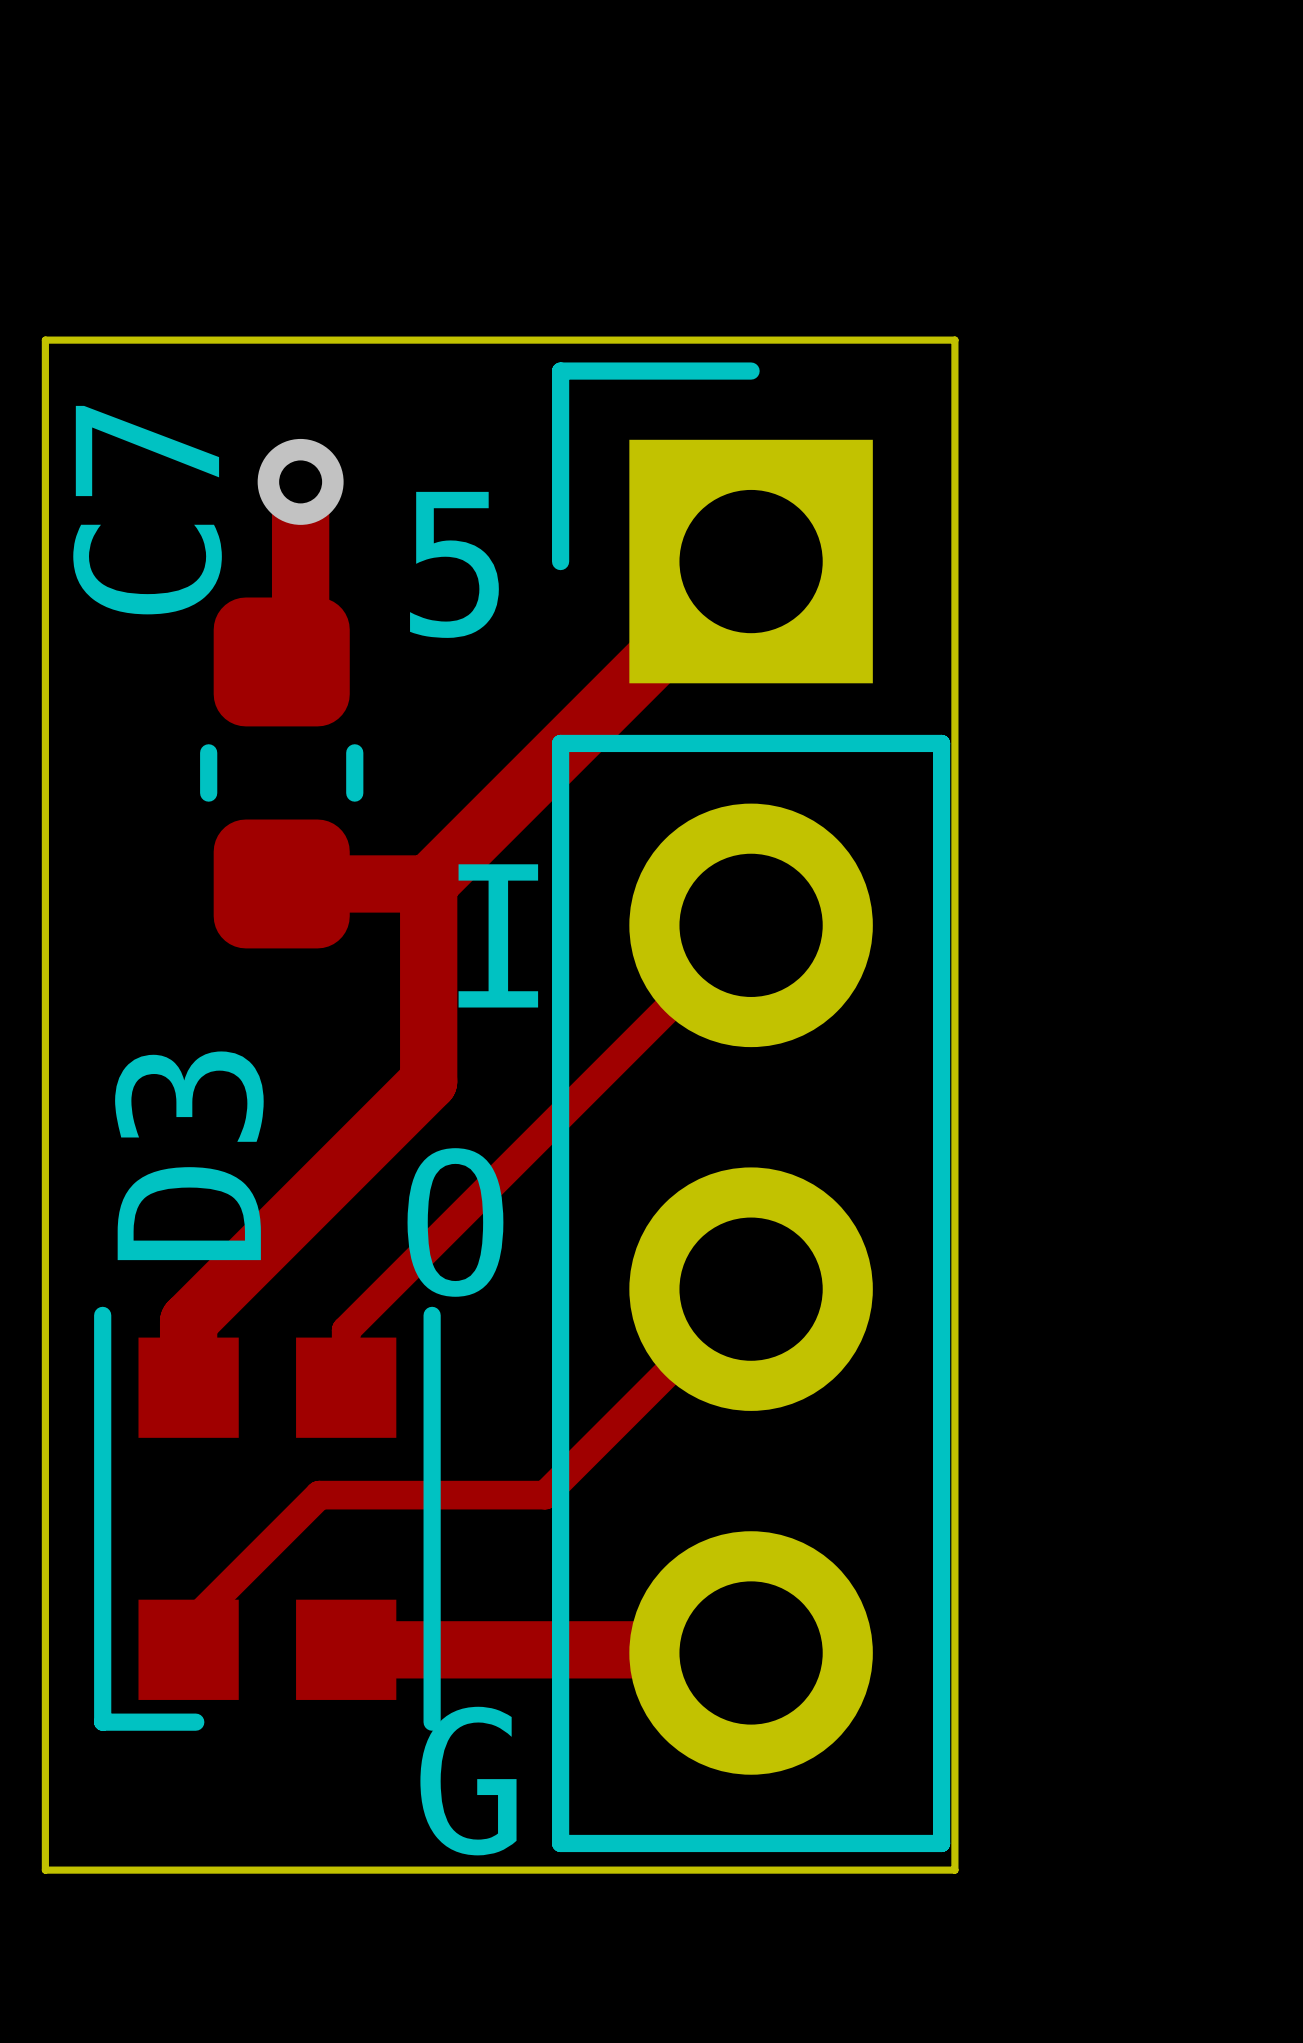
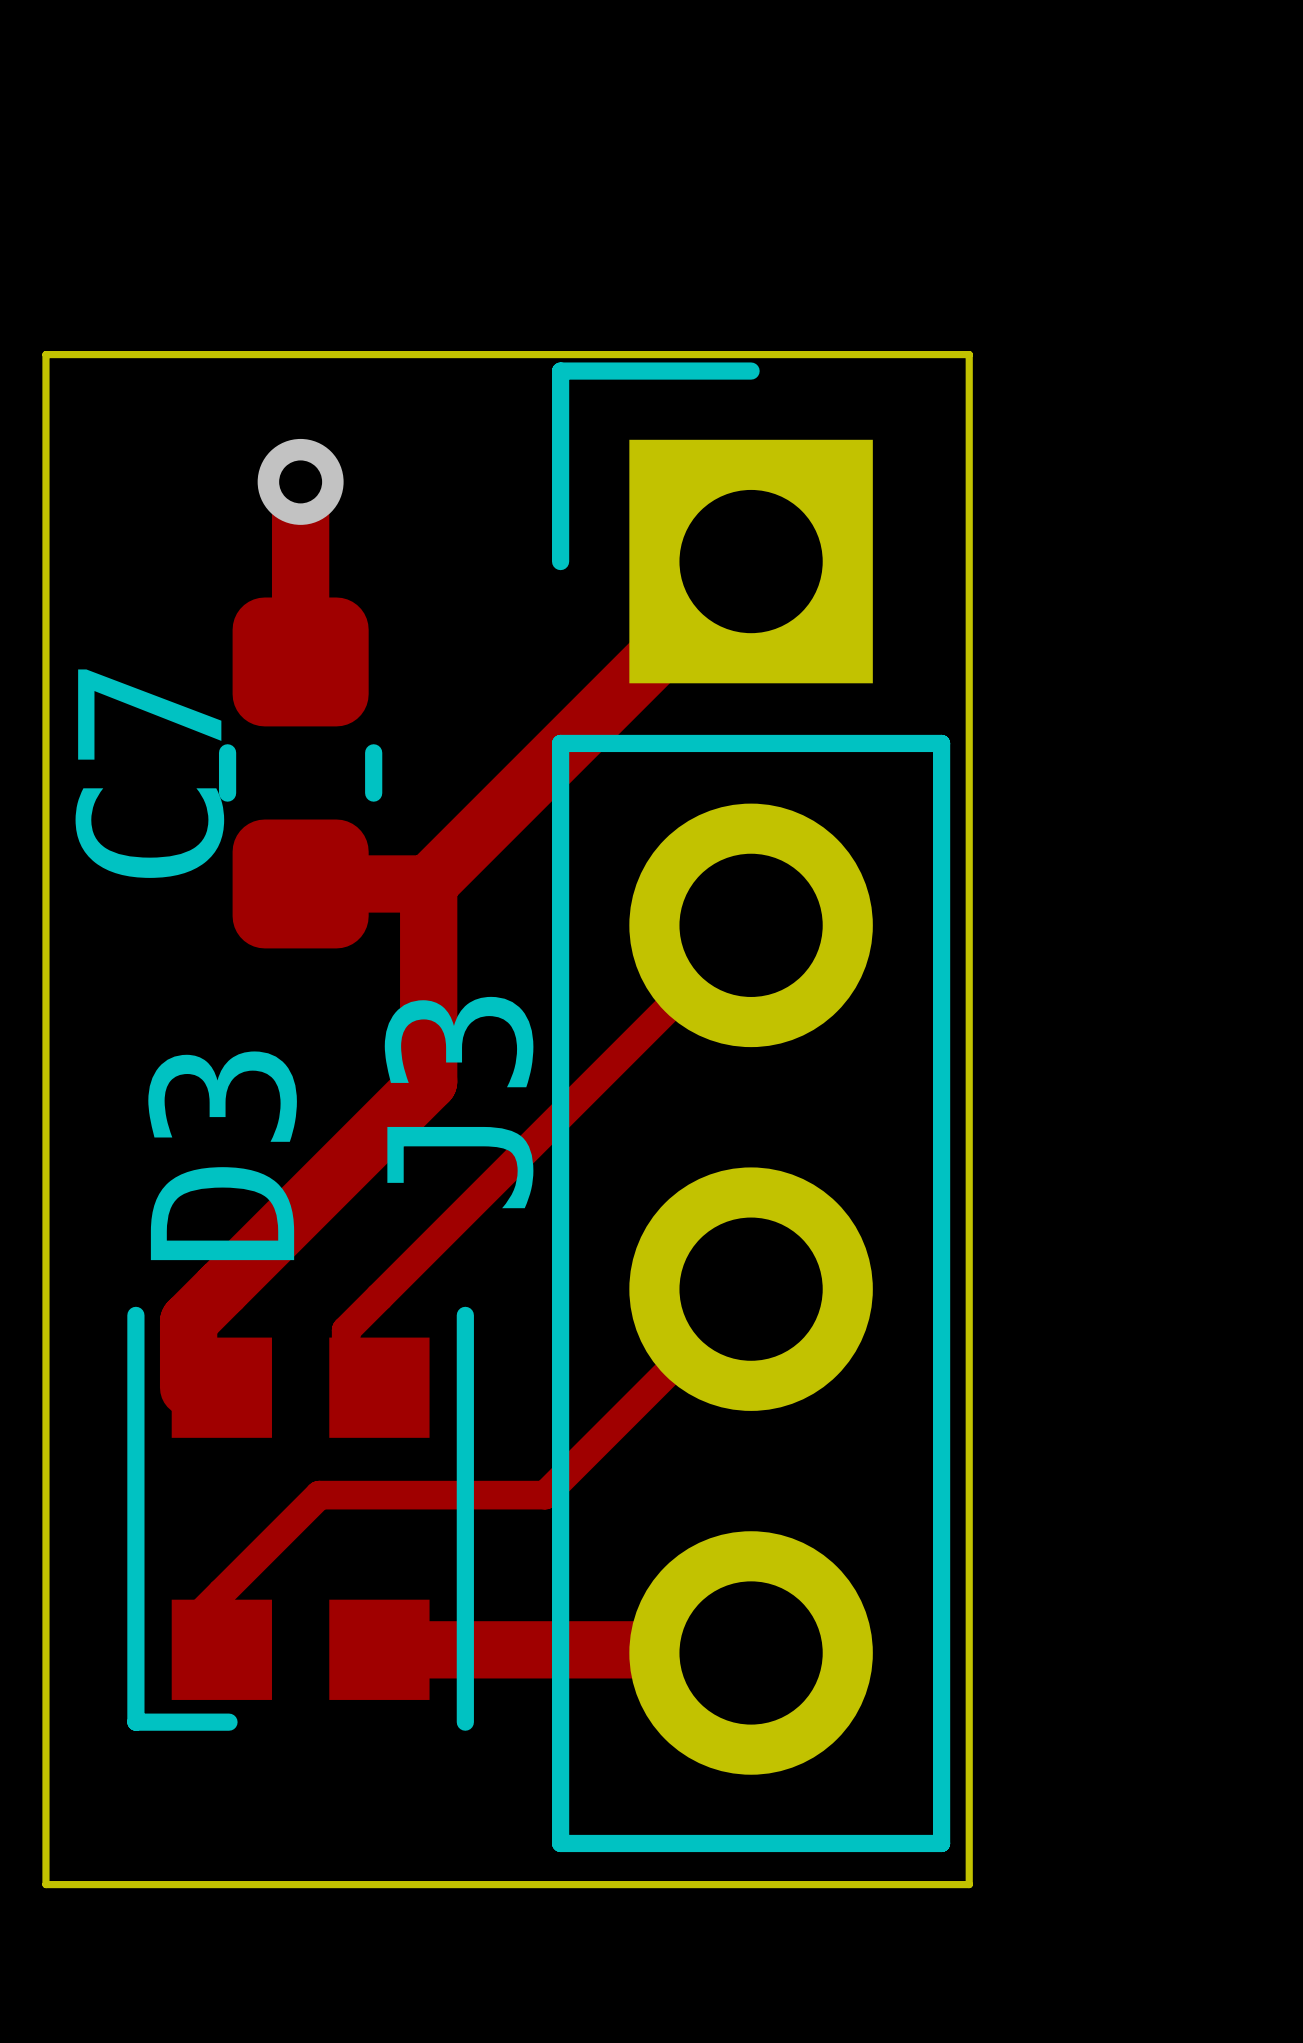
board edge: (45, 354) (45, 340) (954, 340) (954, 1870) (45, 1870) -> (45, 354) (969, 354) (969, 1884) (45, 1884) (45, 1870)
C7 name position: C7 (147, 510) -> C7 (149, 773)
text: 5 (454, 564) -> none
C7 position: (281, 772) -> (300, 772)
text: I (498, 935) -> none
J3 name: none -> J3 (459, 1102)
text: O (455, 1222) -> none
D3 position: (267, 1518) -> (300, 1518)
text: G (468, 1781) -> none

